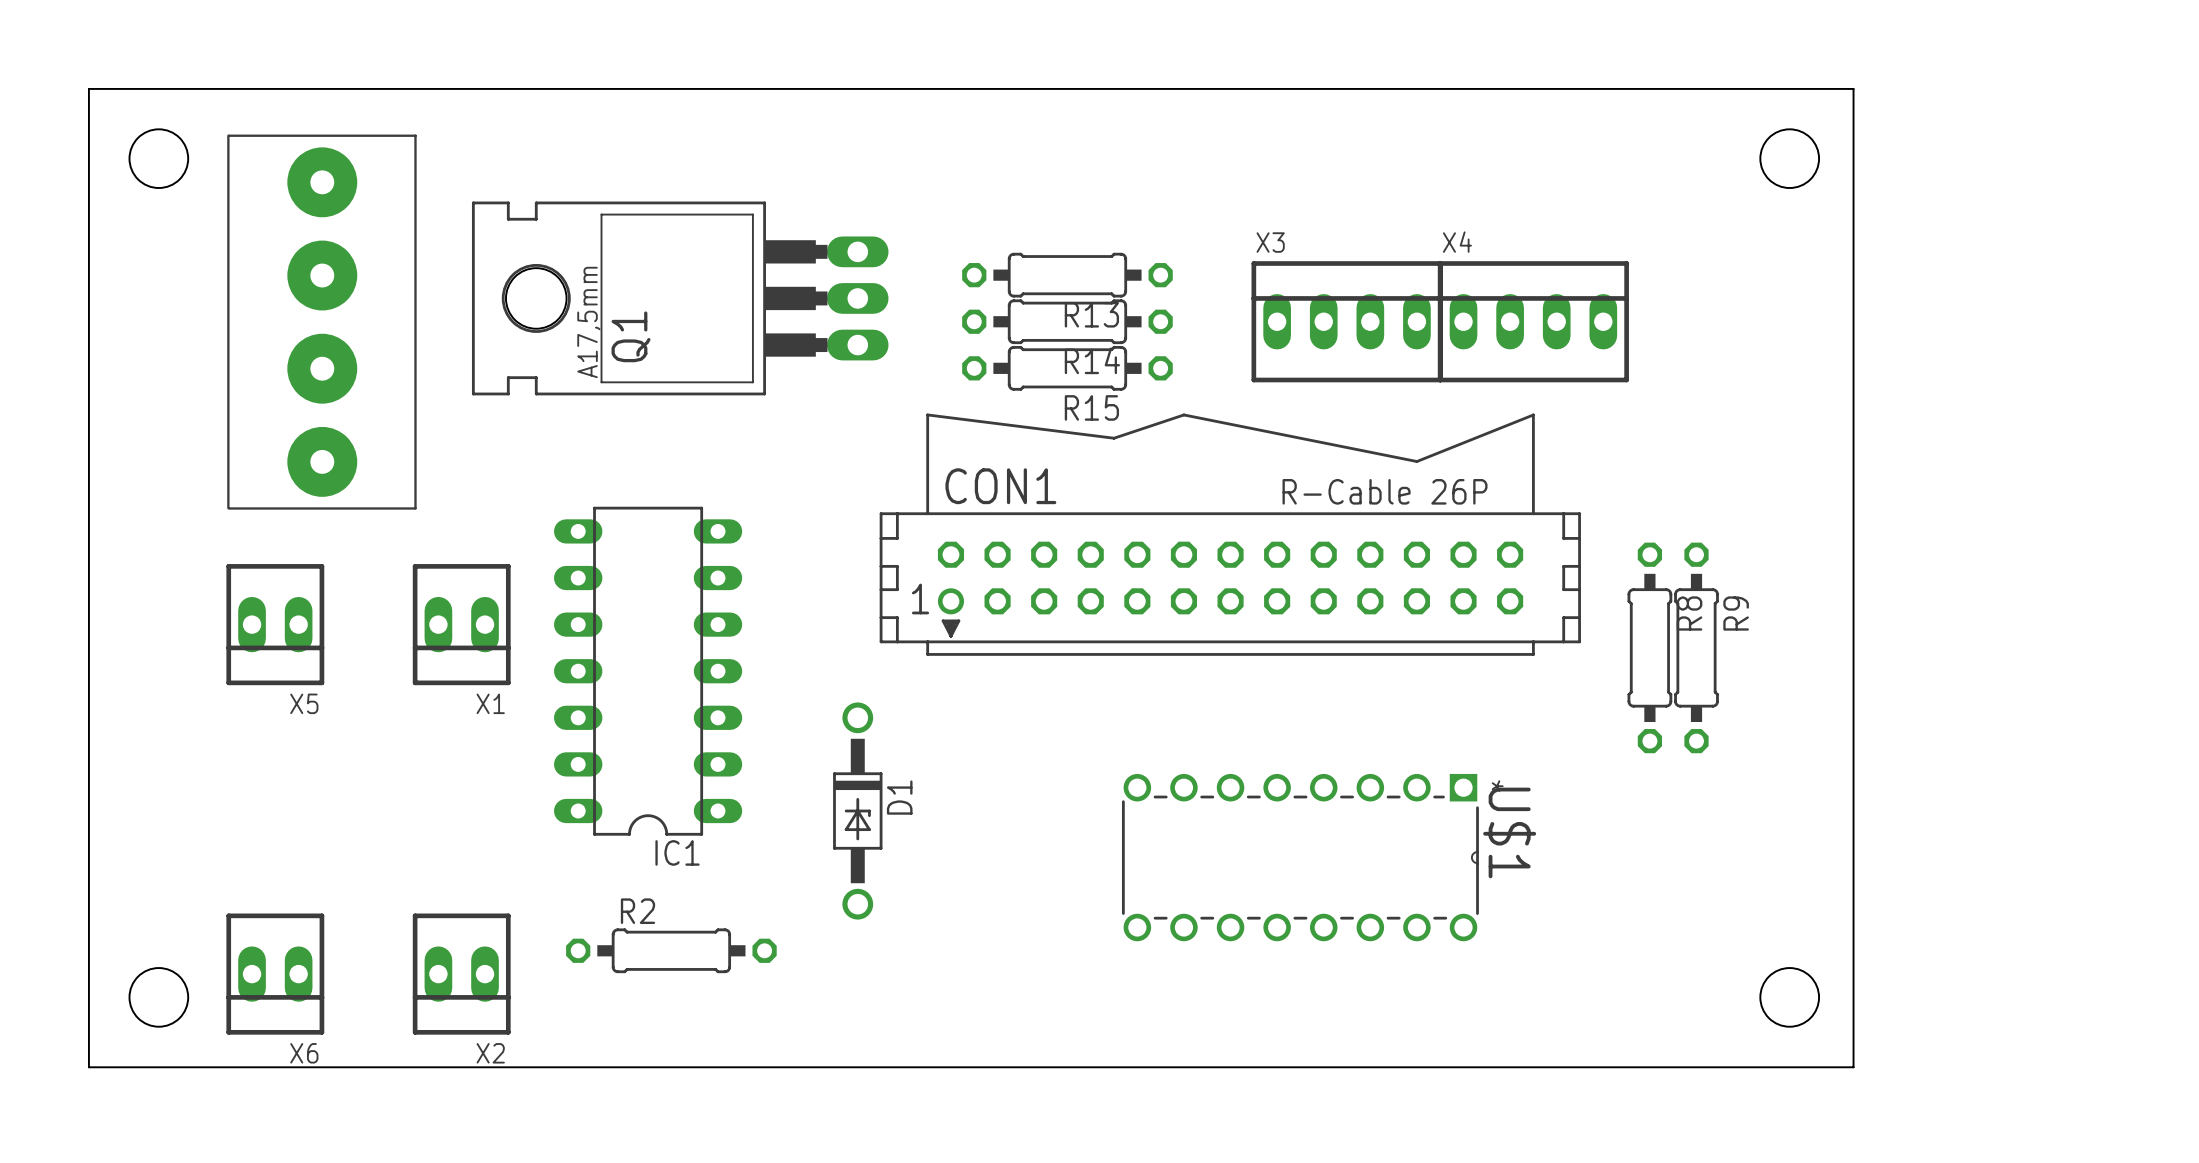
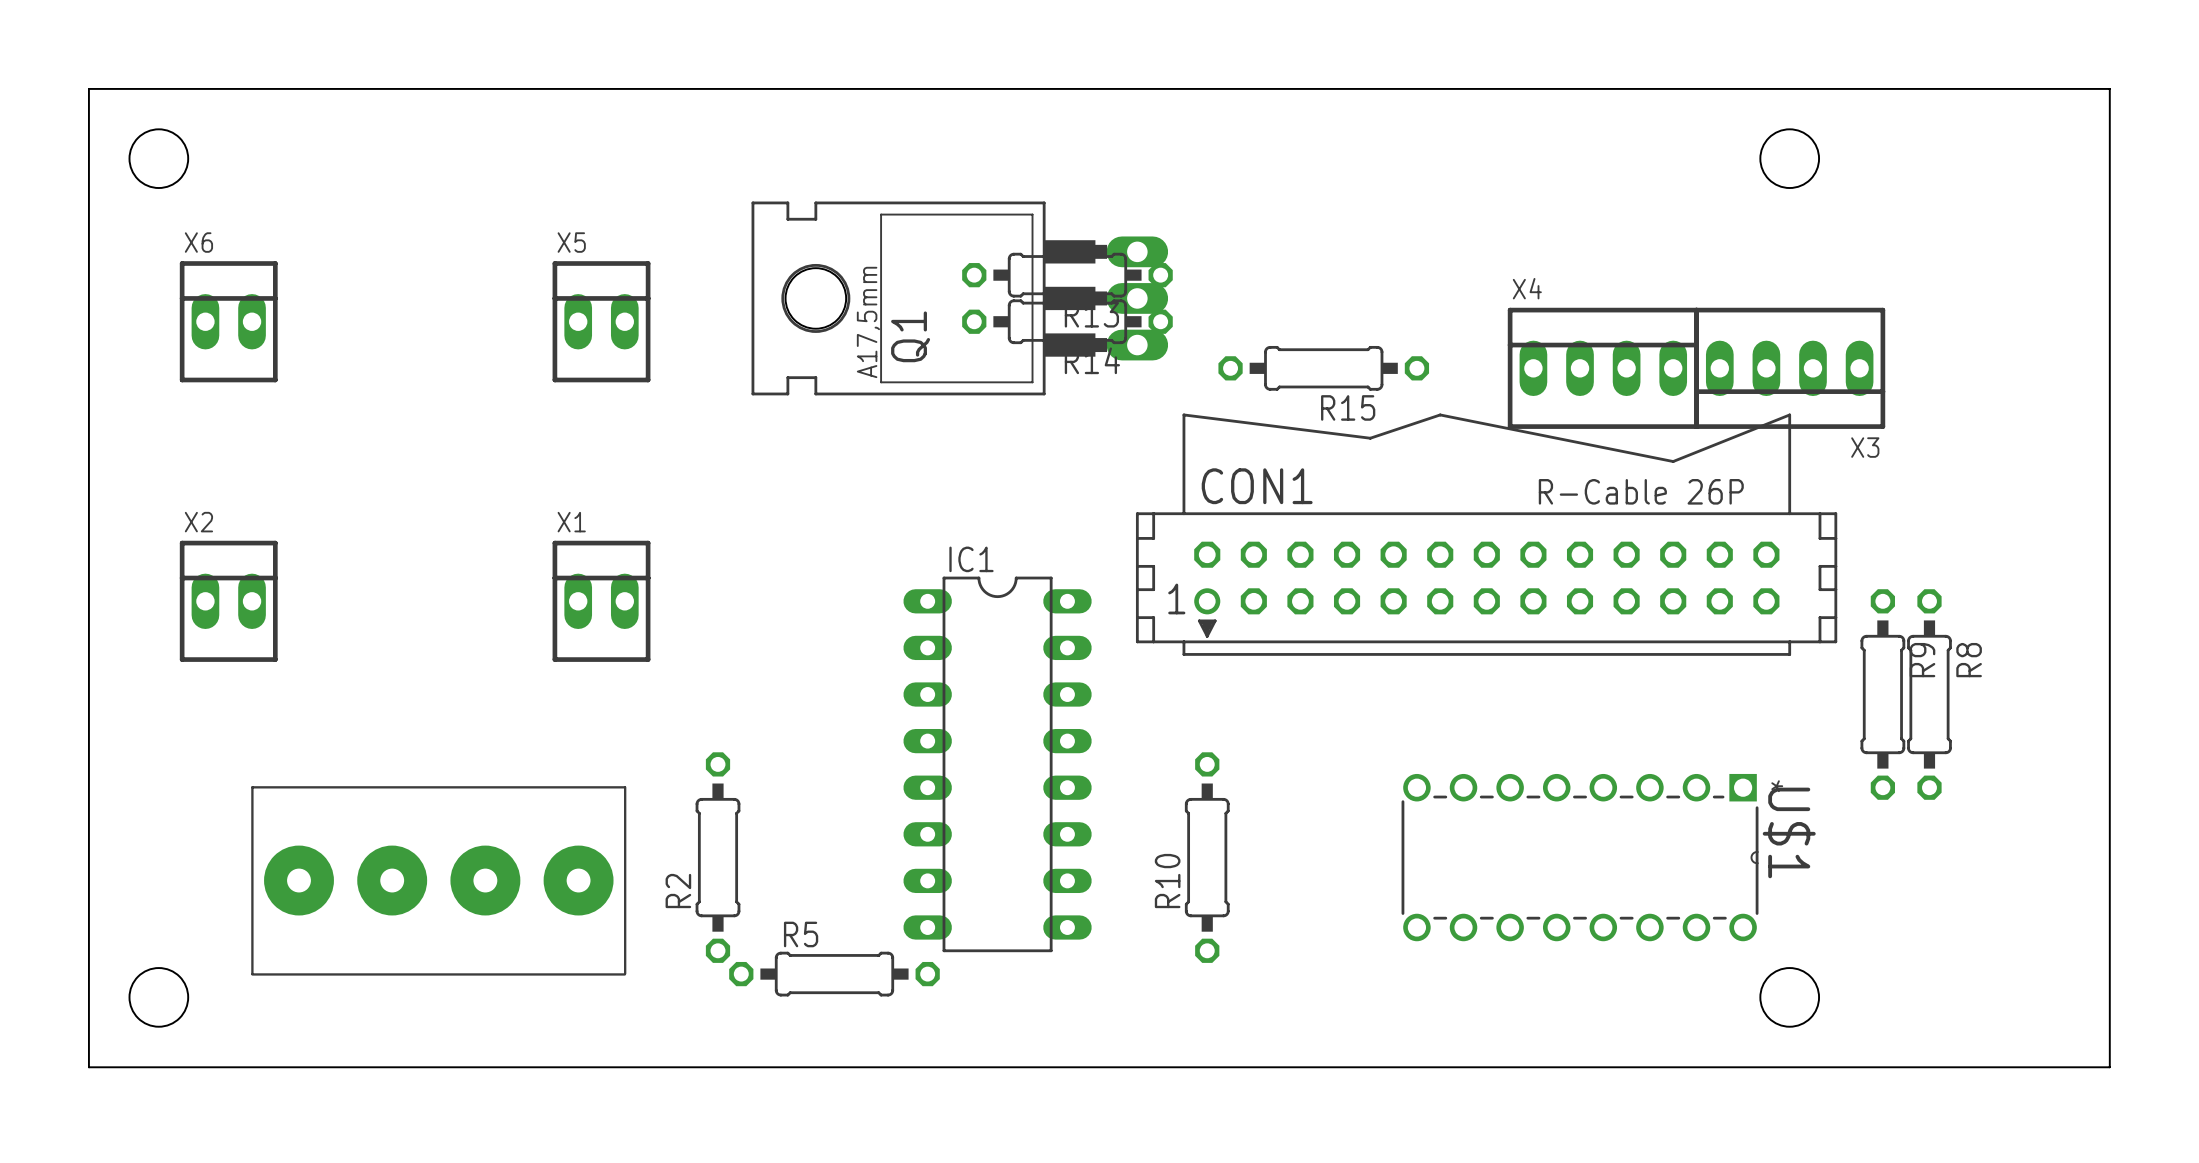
board edge: (1853, 88) (1853, 1067) -> (1853, 88) (2109, 88) (2109, 1067) (1853, 1067)
Q1 position: (680, 298) -> (959, 298)
X3 rotation: 0° (1347, 321) -> 180° (1789, 368)
X3 position: (1347, 321) -> (1789, 368)
X4 position: (1533, 321) -> (1603, 368)
part: (321, 322) -> none
R15 position: (1067, 368) -> (1323, 368)
IC1 footprint: [553, 506, 743, 836] -> [903, 576, 1092, 953]
CON1 position: (1230, 534) -> (1486, 534)
X5 rotation: 0° (275, 624) -> 180° (601, 321)
X5 position: (275, 624) -> (601, 321)
X1 rotation: 0° (461, 624) -> 180° (601, 601)
X1 position: (461, 624) -> (601, 601)
R8 position: (1649, 647) -> (1929, 694)
R9 position: (1696, 647) -> (1882, 694)
D1: (857, 811) -> none
IC1 name position: IC1 (677, 852) -> IC1 (971, 559)
R10: none -> (1207, 857)
U$1 position: (1300, 857) -> (1580, 857)
part: none -> (438, 880)
R2 name position: R2 (637, 911) -> R2 (678, 891)
R2 rotation: 0° (671, 950) -> 90° clockwise (717, 857)
X6 rotation: 0° (275, 974) -> 180° (228, 321)
X6 position: (275, 974) -> (228, 321)
X2 rotation: 0° (461, 974) -> 180° (228, 601)
X2 position: (461, 974) -> (228, 601)
R5: none -> (834, 974)

